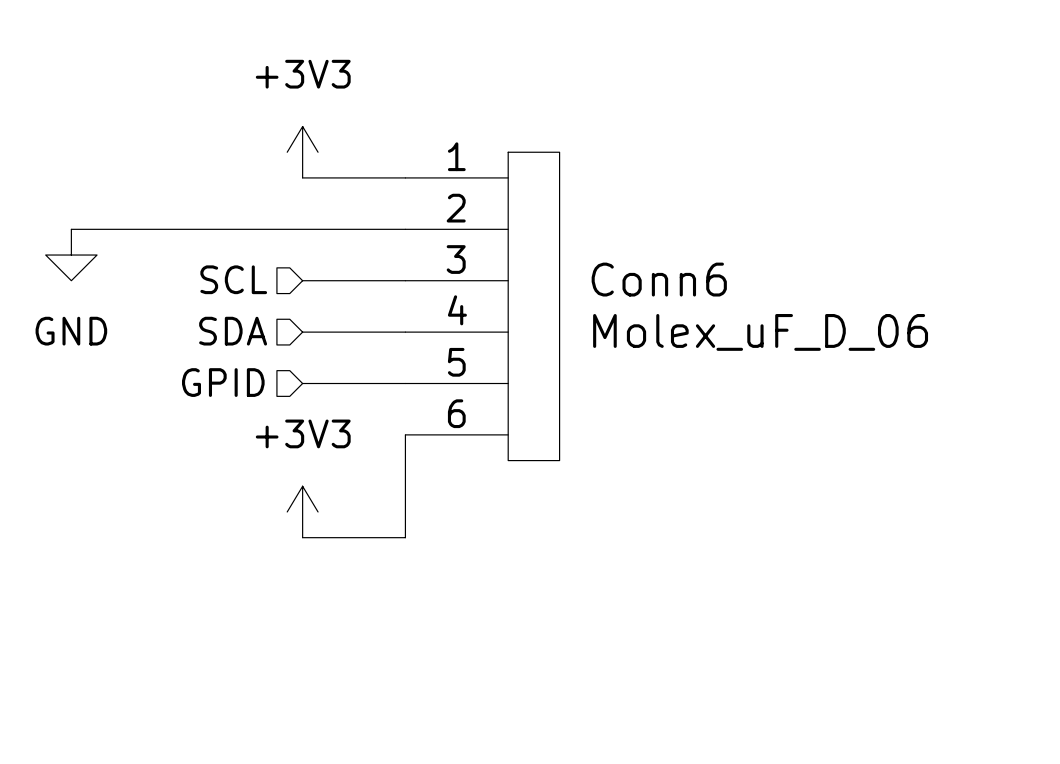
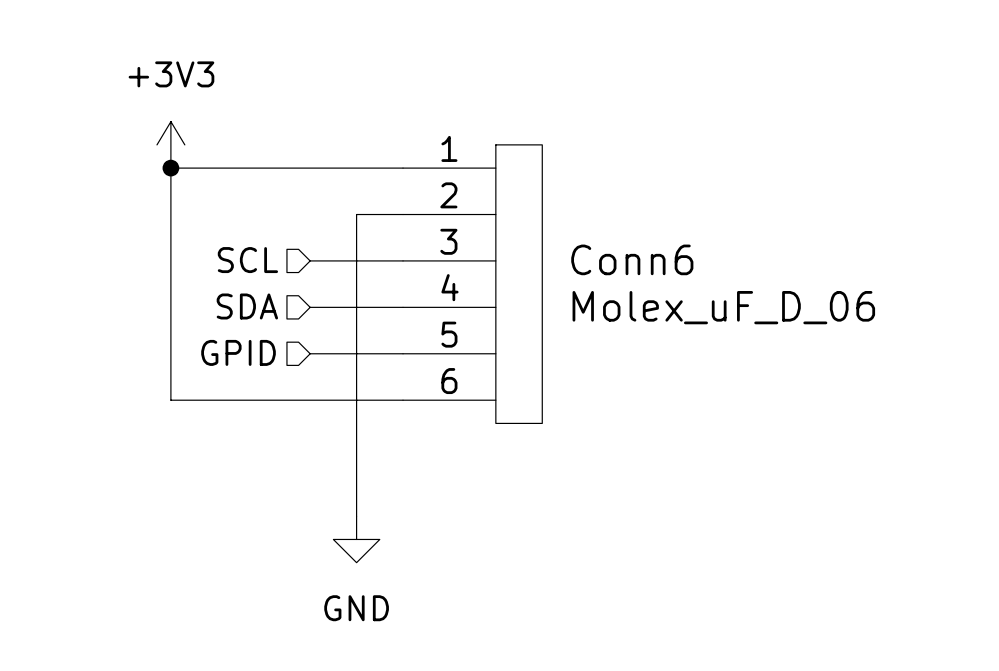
power symbol position: +3V3 (302, 152) -> +3V3 (170, 144)
junction: none -> (170, 168)
wire: (71, 229) (354, 229) -> (356, 516) (356, 214)
power symbol position: GND (71, 255) -> GND (356, 539)
wire: (405, 434) (405, 537) (302, 537) -> (403, 400) (170, 400) (170, 168) (310, 168)
power symbol: +3V3 (302, 511) -> none

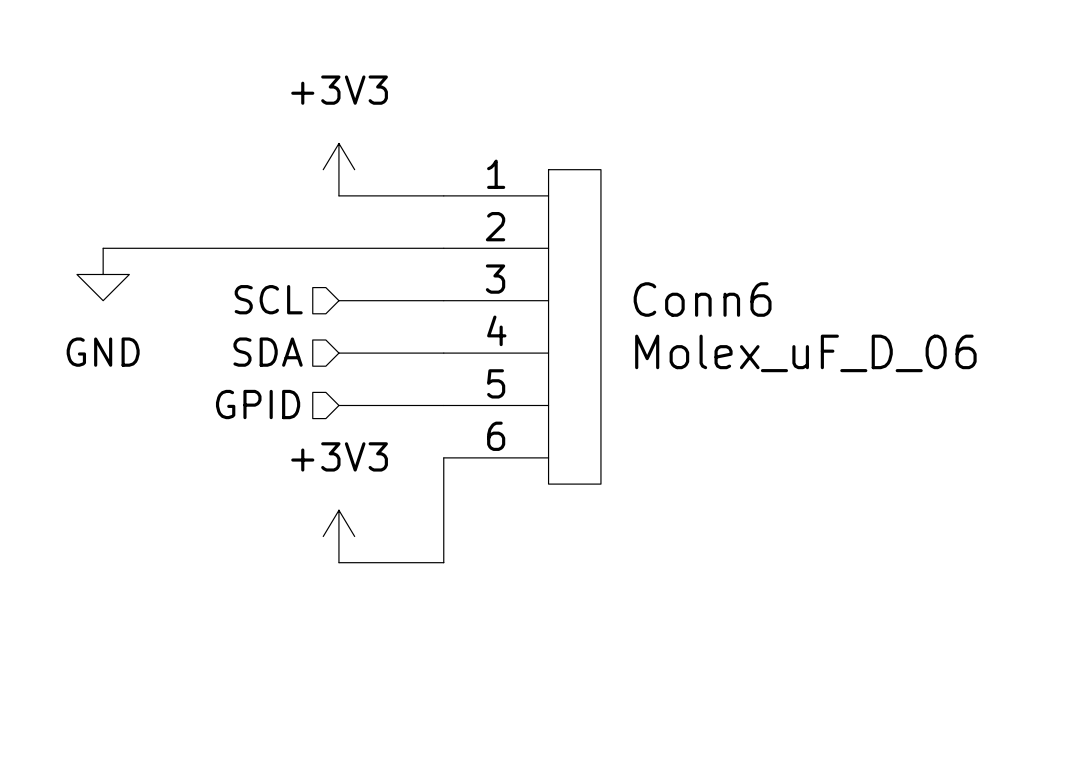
power symbol position: +3V3 (170, 144) -> +3V3 (338, 169)
junction: (170, 168) -> none
wire: (310, 168) (170, 168) (170, 400) (403, 400) -> (338, 562) (443, 562) (443, 457)
wire: (356, 214) (356, 516) -> (391, 248) (103, 248)
power symbol: none -> +3V3 (338, 536)
power symbol position: GND (356, 539) -> GND (103, 274)

